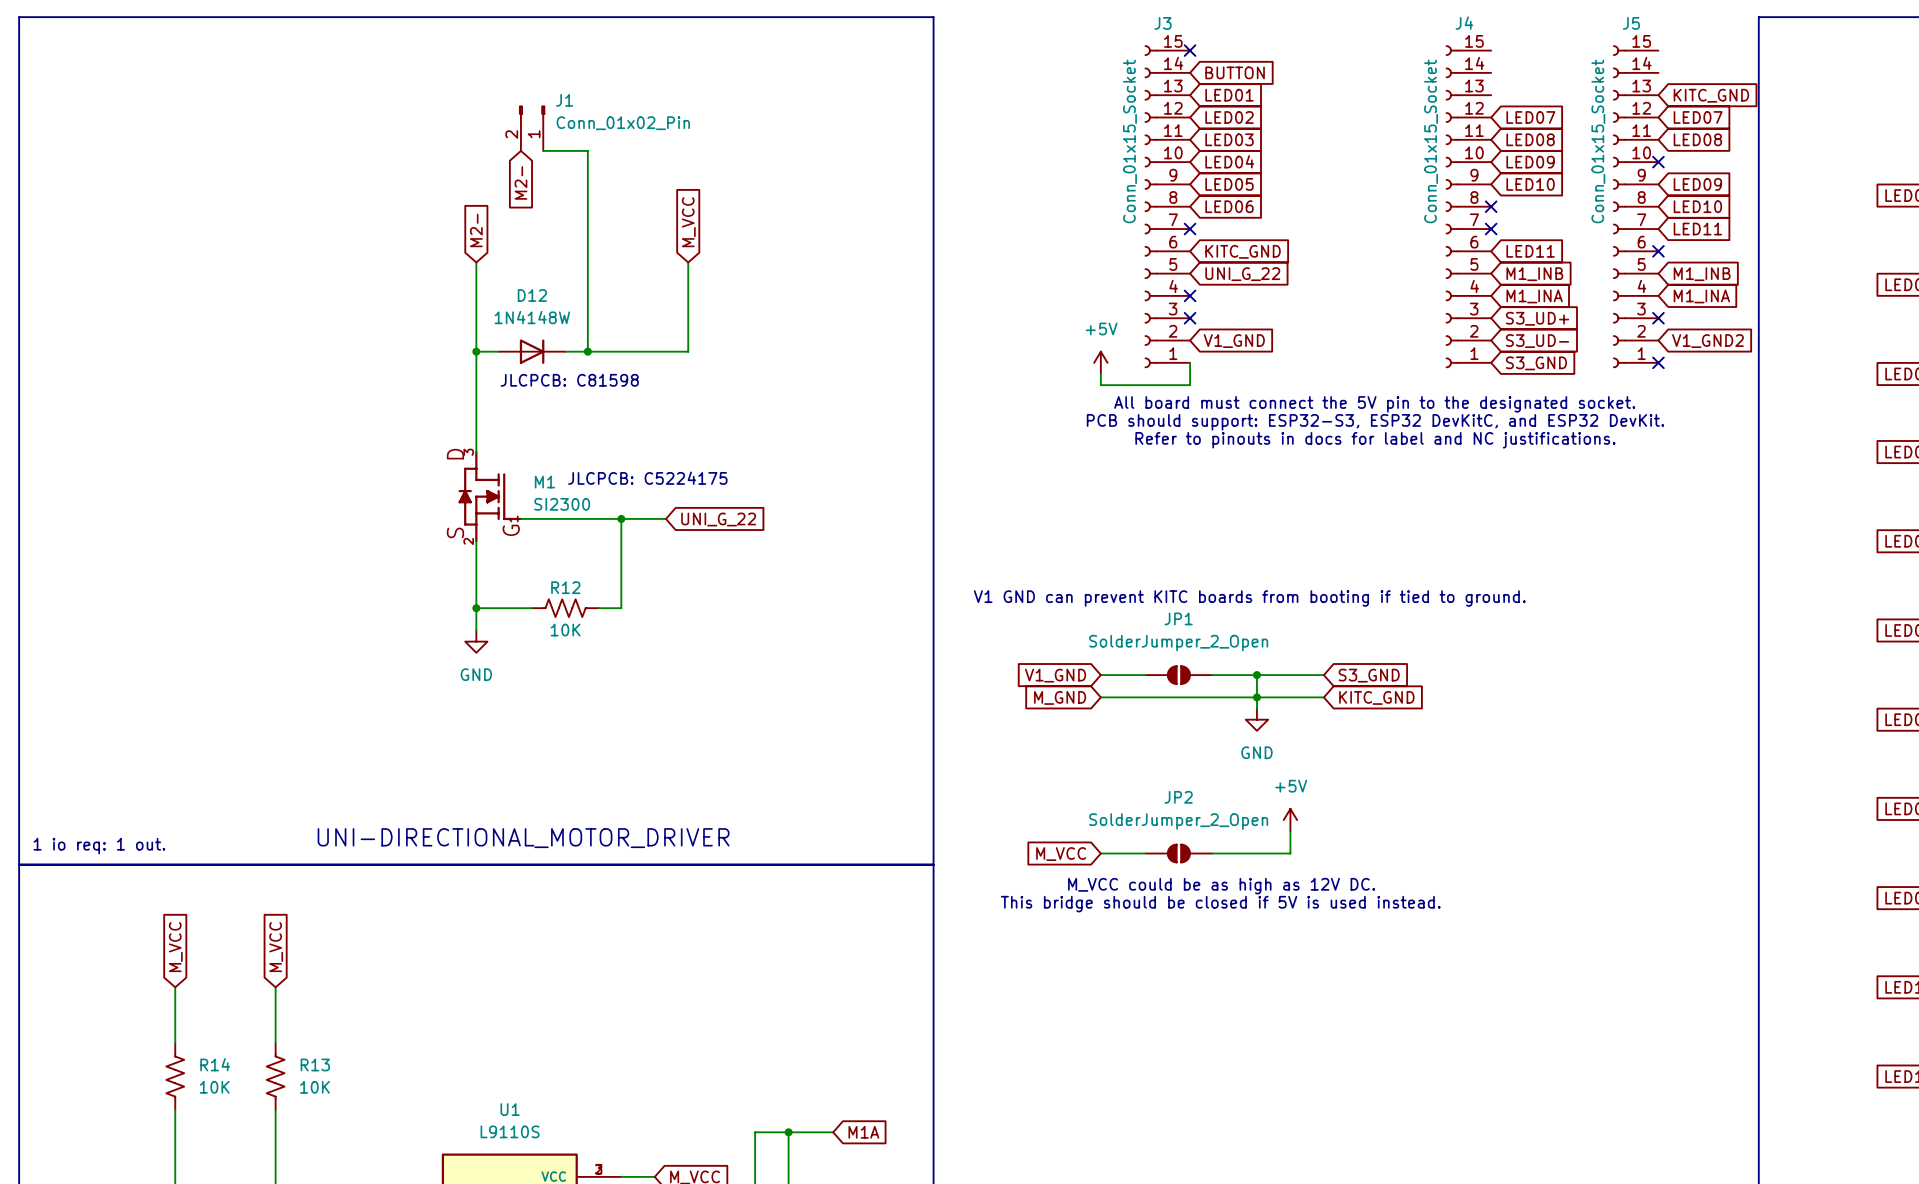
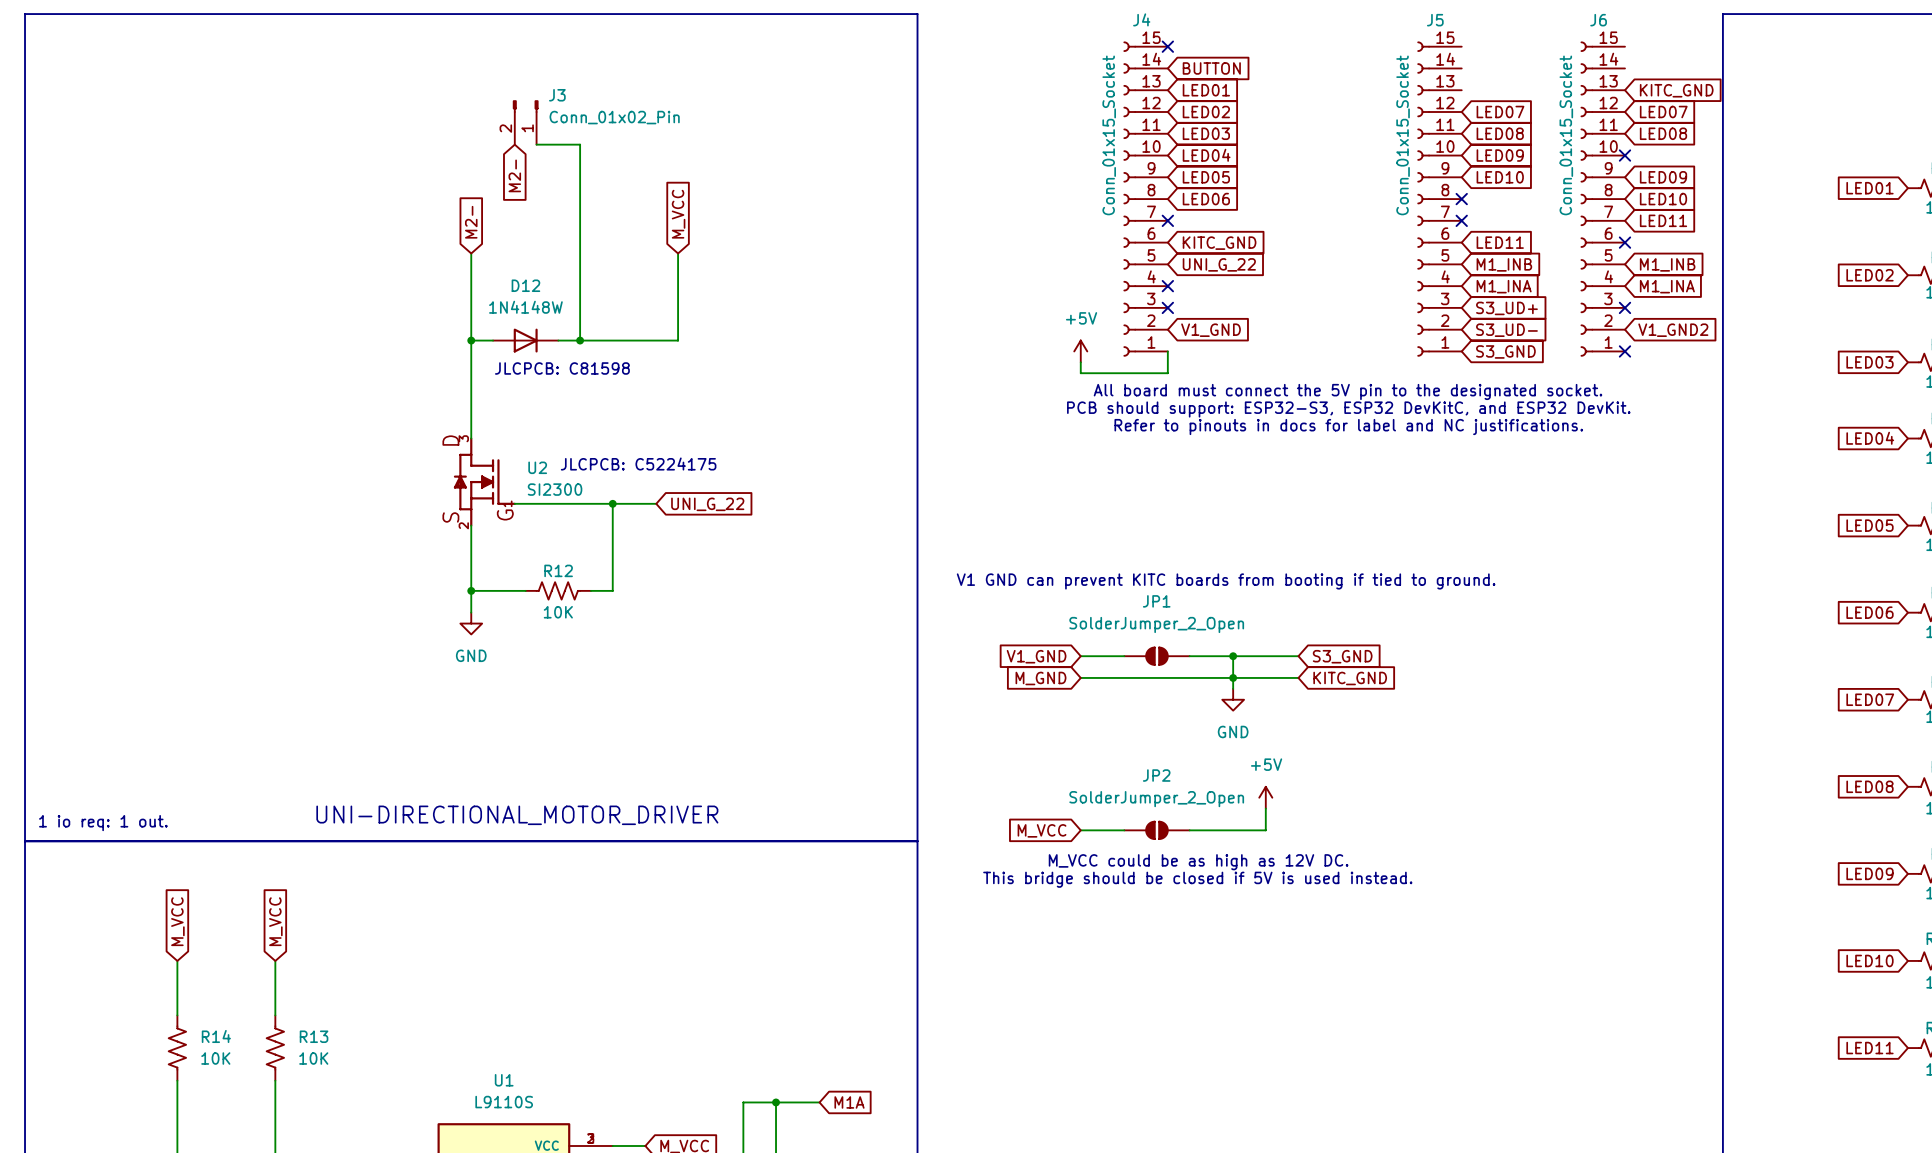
J3 name: J3 (1163, 23) -> J4 (1141, 19)
J4 name: J4 (1464, 23) -> J5 (1435, 20)
J5 name: J5 (1631, 23) -> J6 (1598, 20)
J1 name: J1 (564, 100) -> J3 (557, 95)
M1 name: M1 (544, 482) -> U2 (537, 467)

